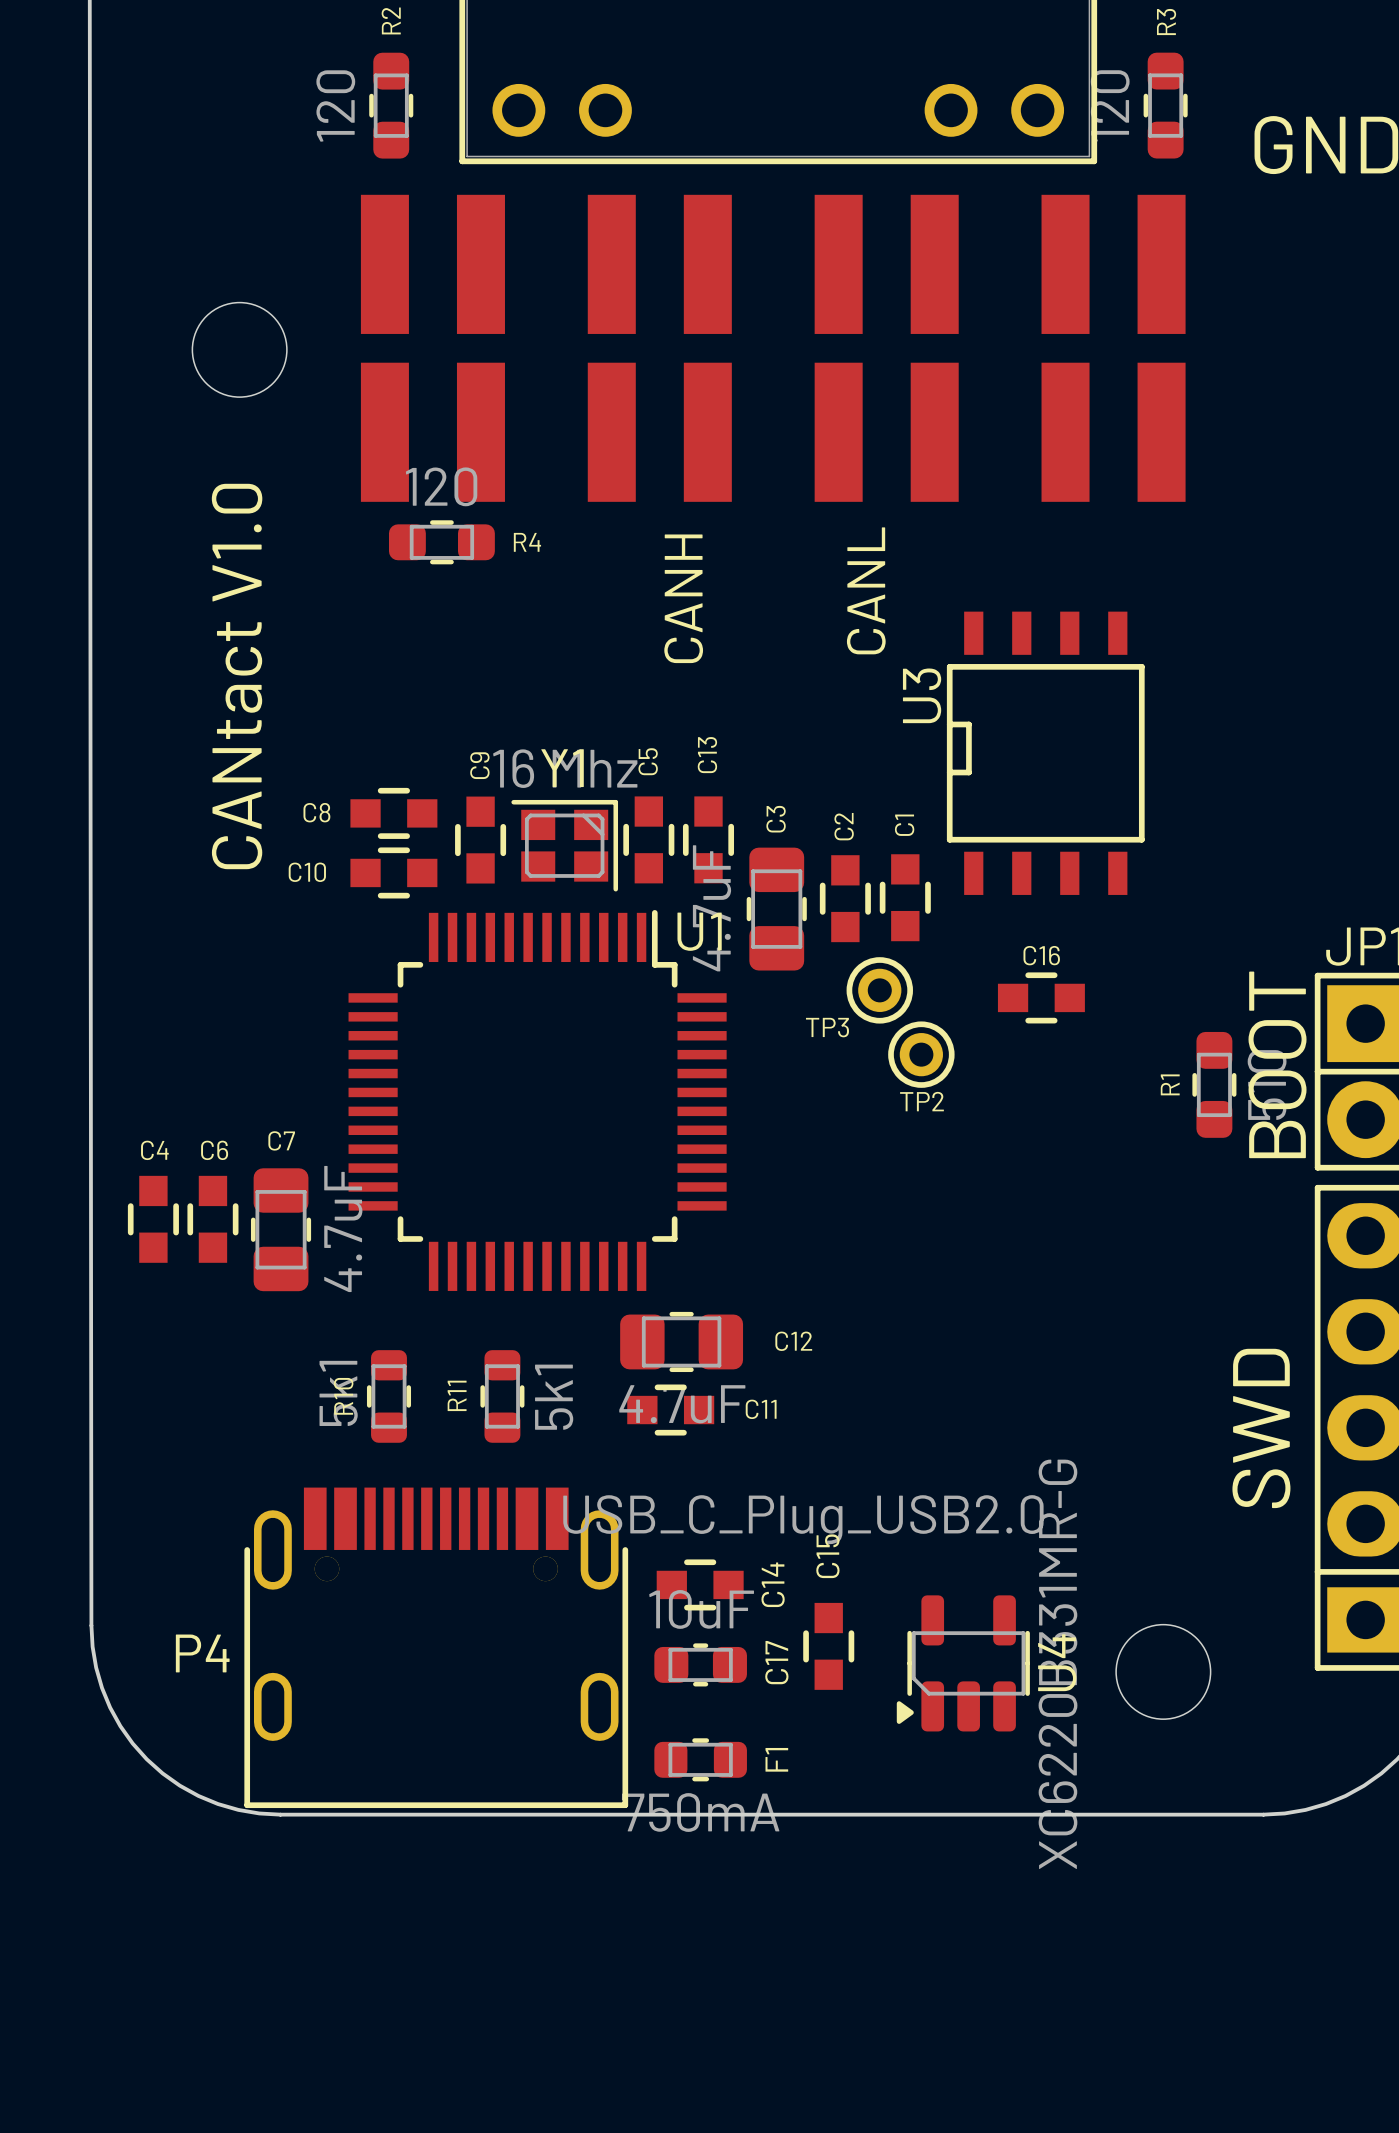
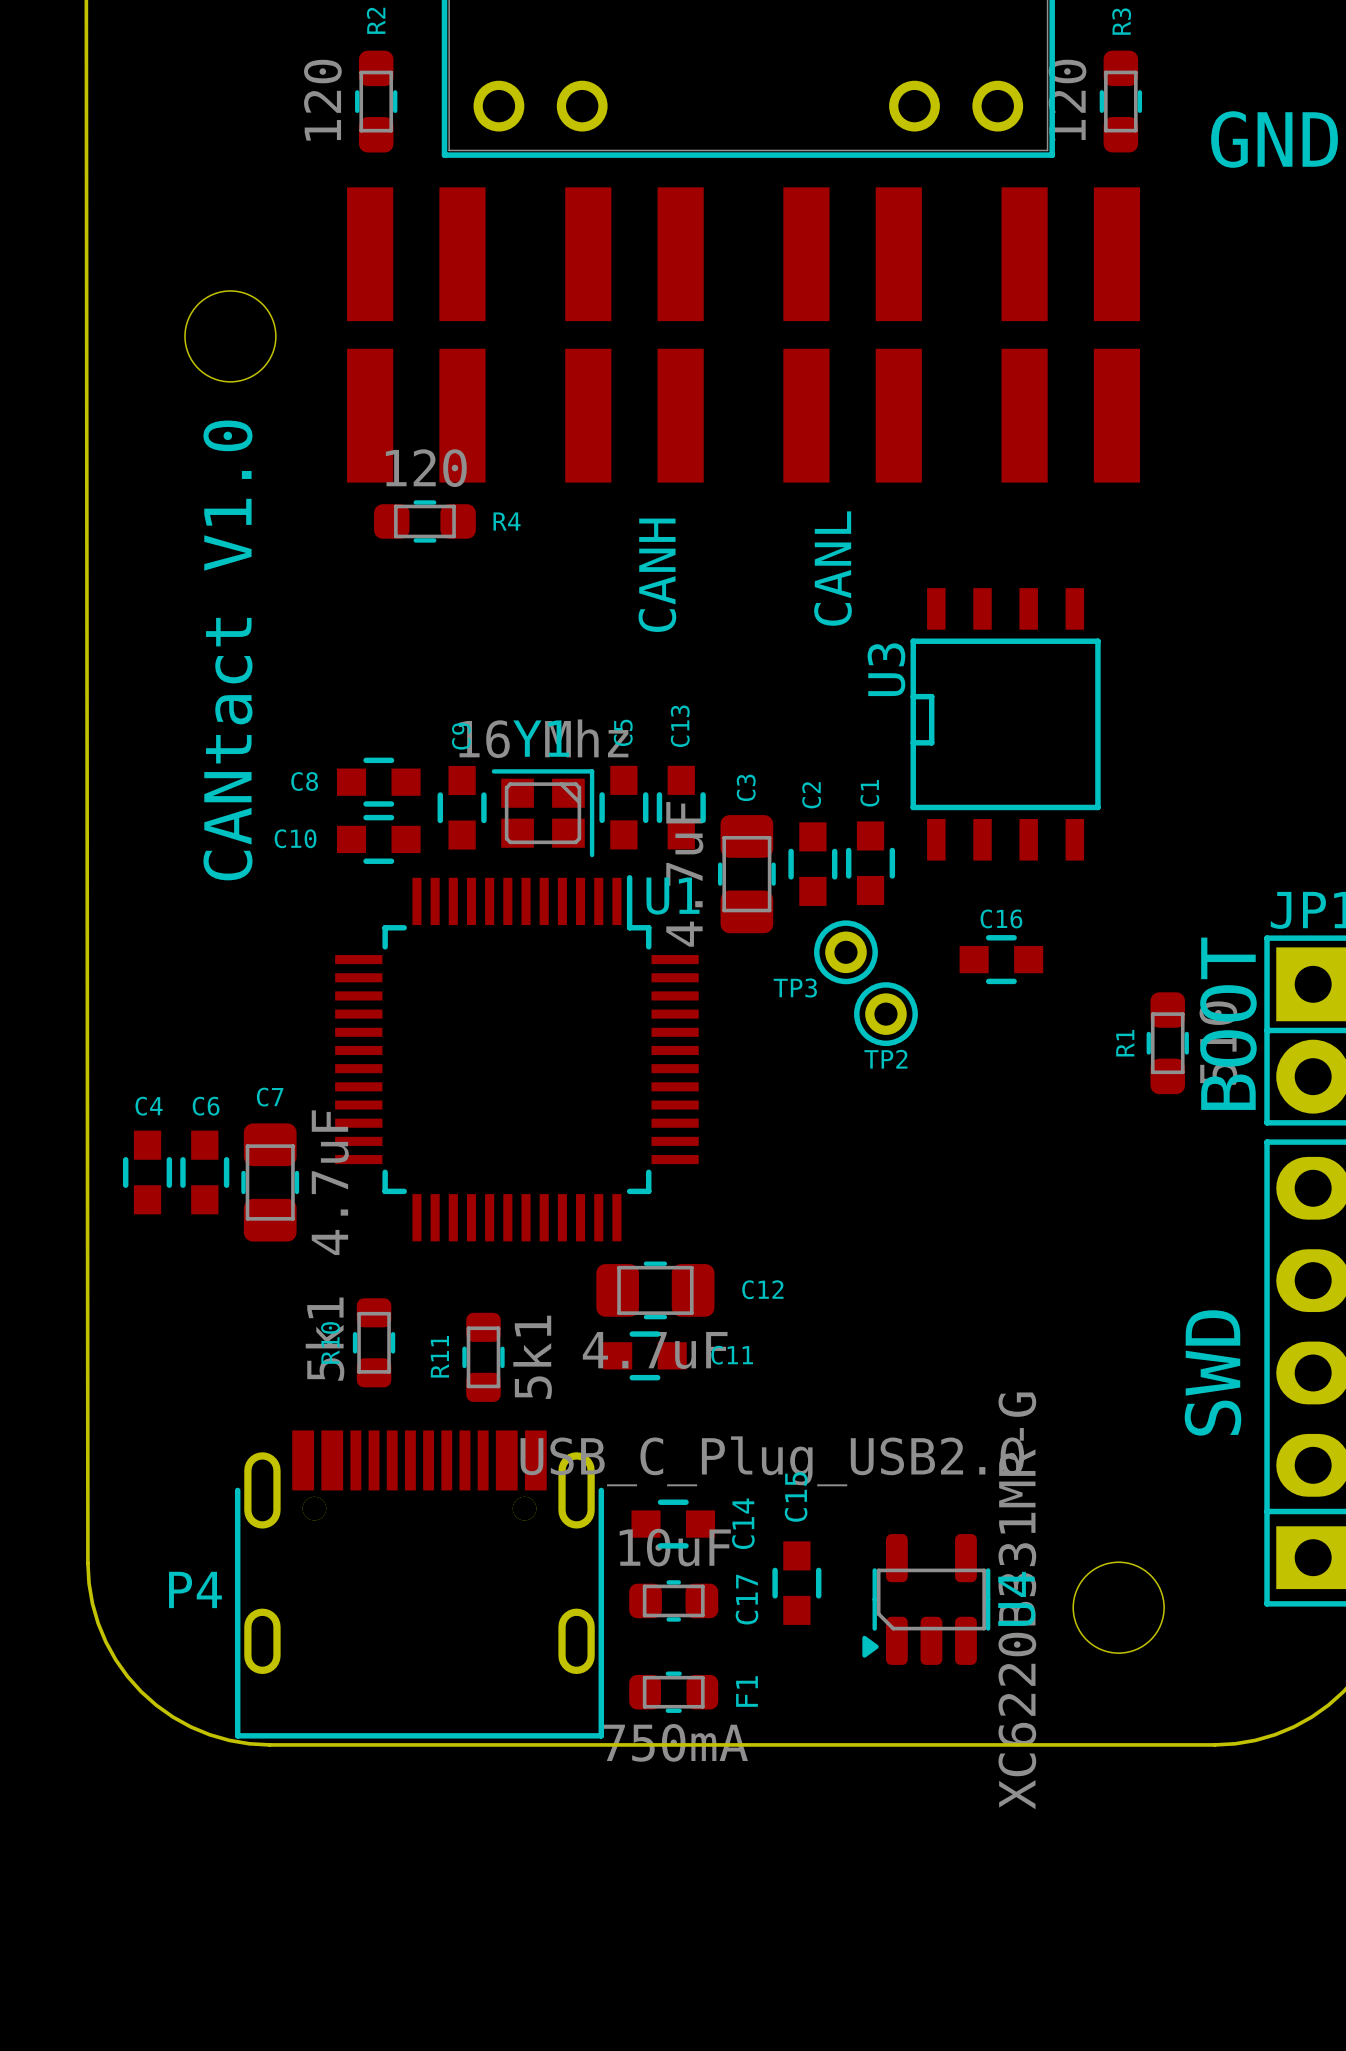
R11 position: (502, 1396) -> (483, 1357)

